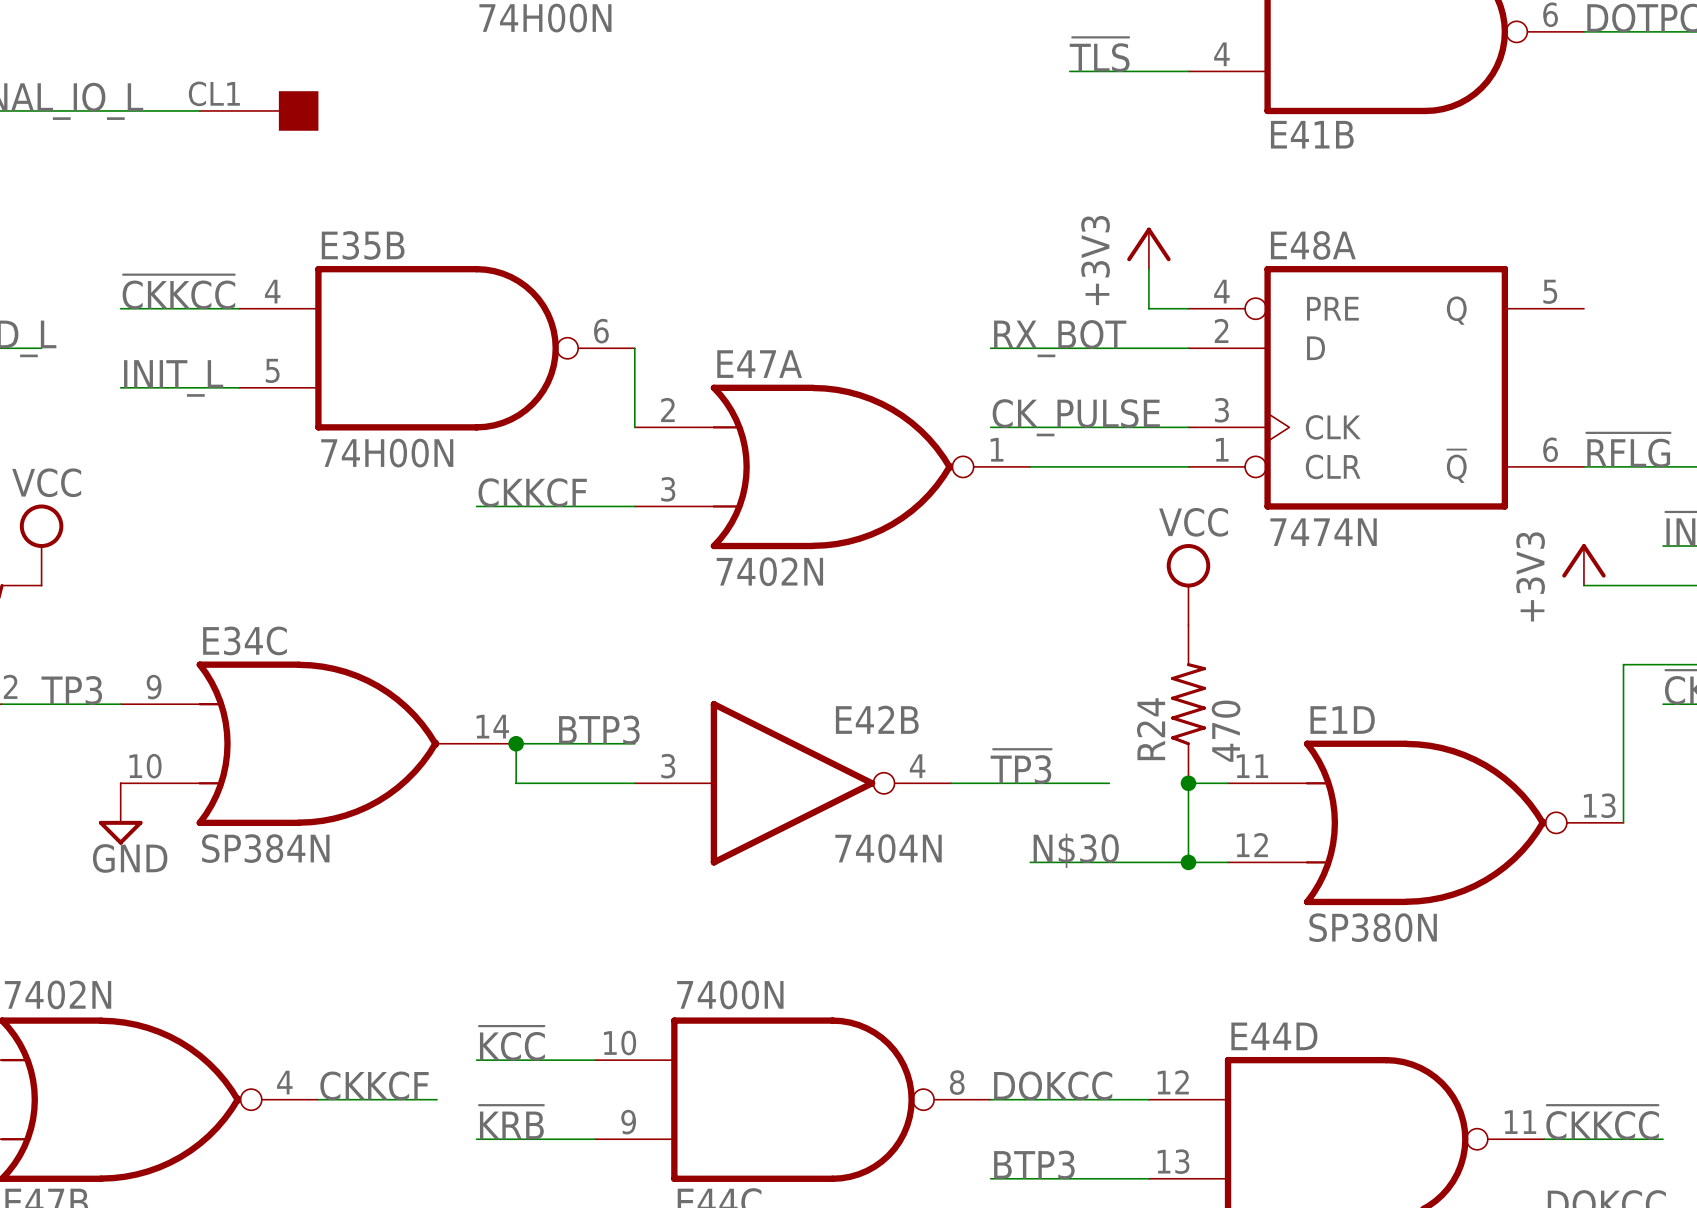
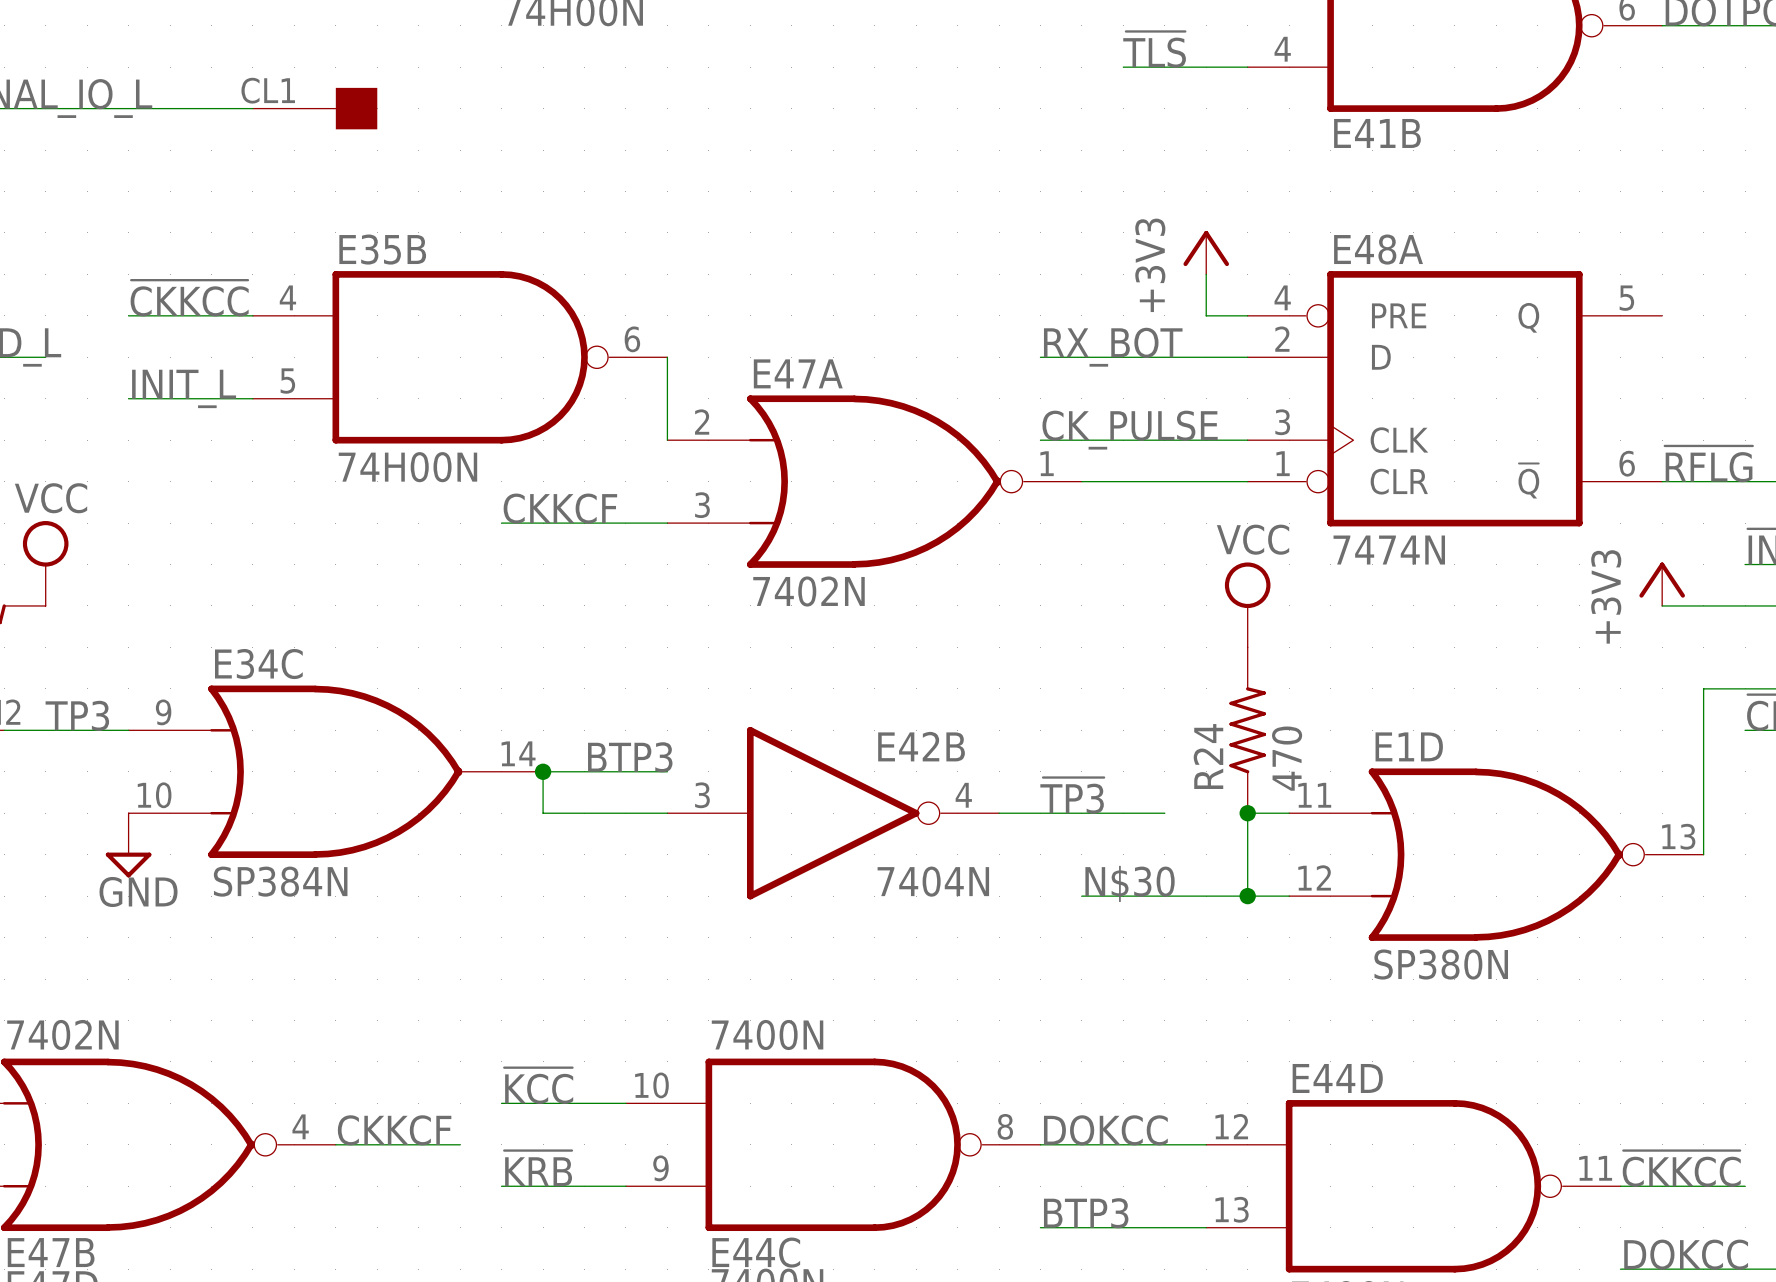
part position: (259, 110) -> (315, 108)

